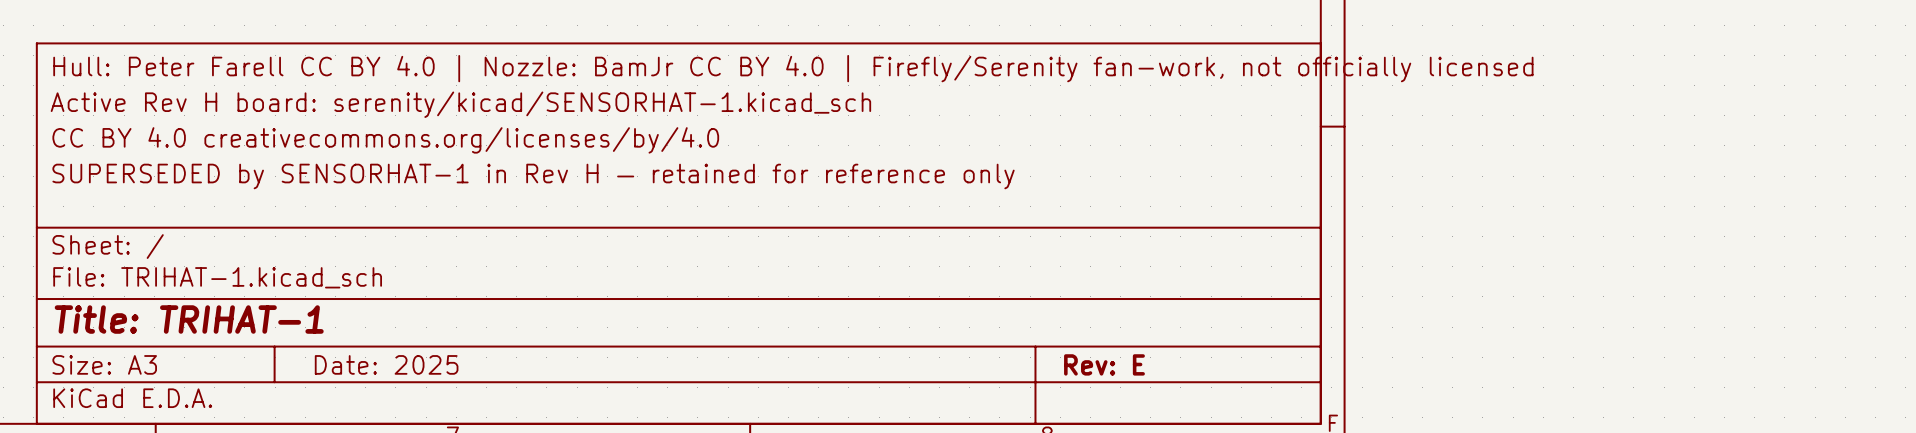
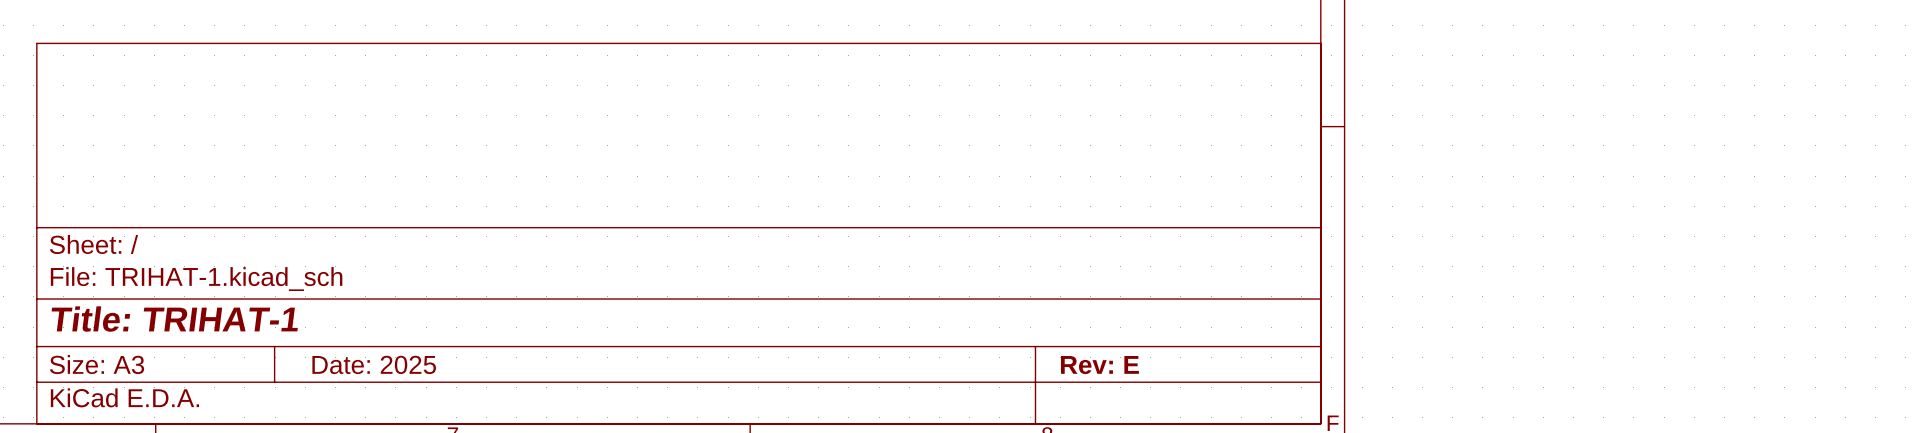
title block: Hull: Peter Farell CC BY 4.0 | Nozzle: BamJr CC BY 4.0 | Firefly/Serenity fan-work, not officially licensed (793, 68) -> none
title block: Active Rev H board: serenity/kicad/SENSORHAT-1.kicad_sch (460, 104) -> none
title block: CC BY 4.0 creativecommons.org/licenses/by/4.0 (385, 140) -> none
title block: SUPERSEDED by SENSORHAT-1 in Rev H — retained for reference only (533, 176) -> none

